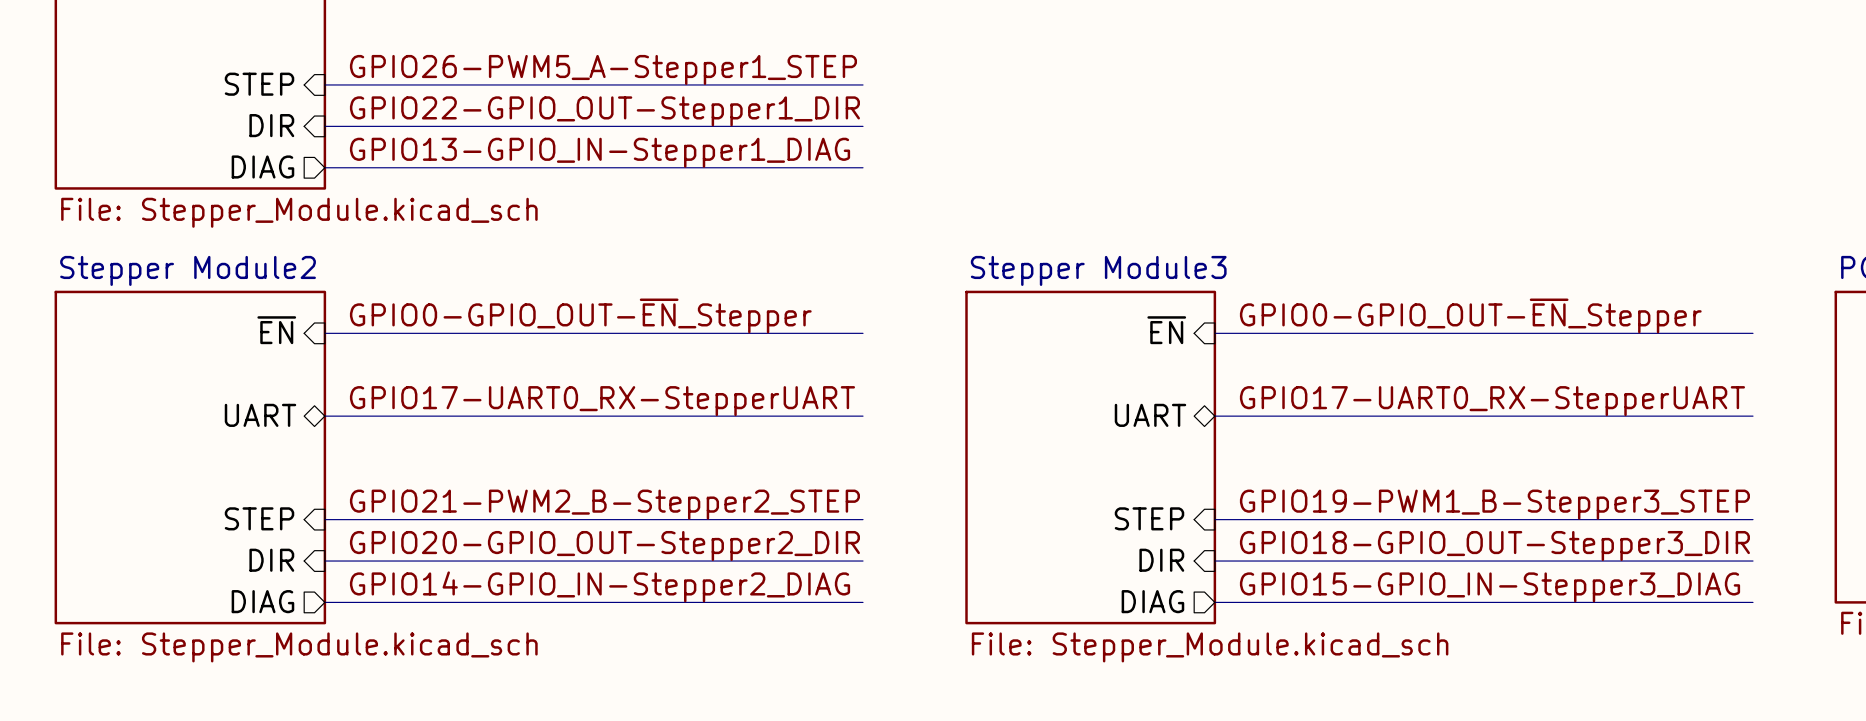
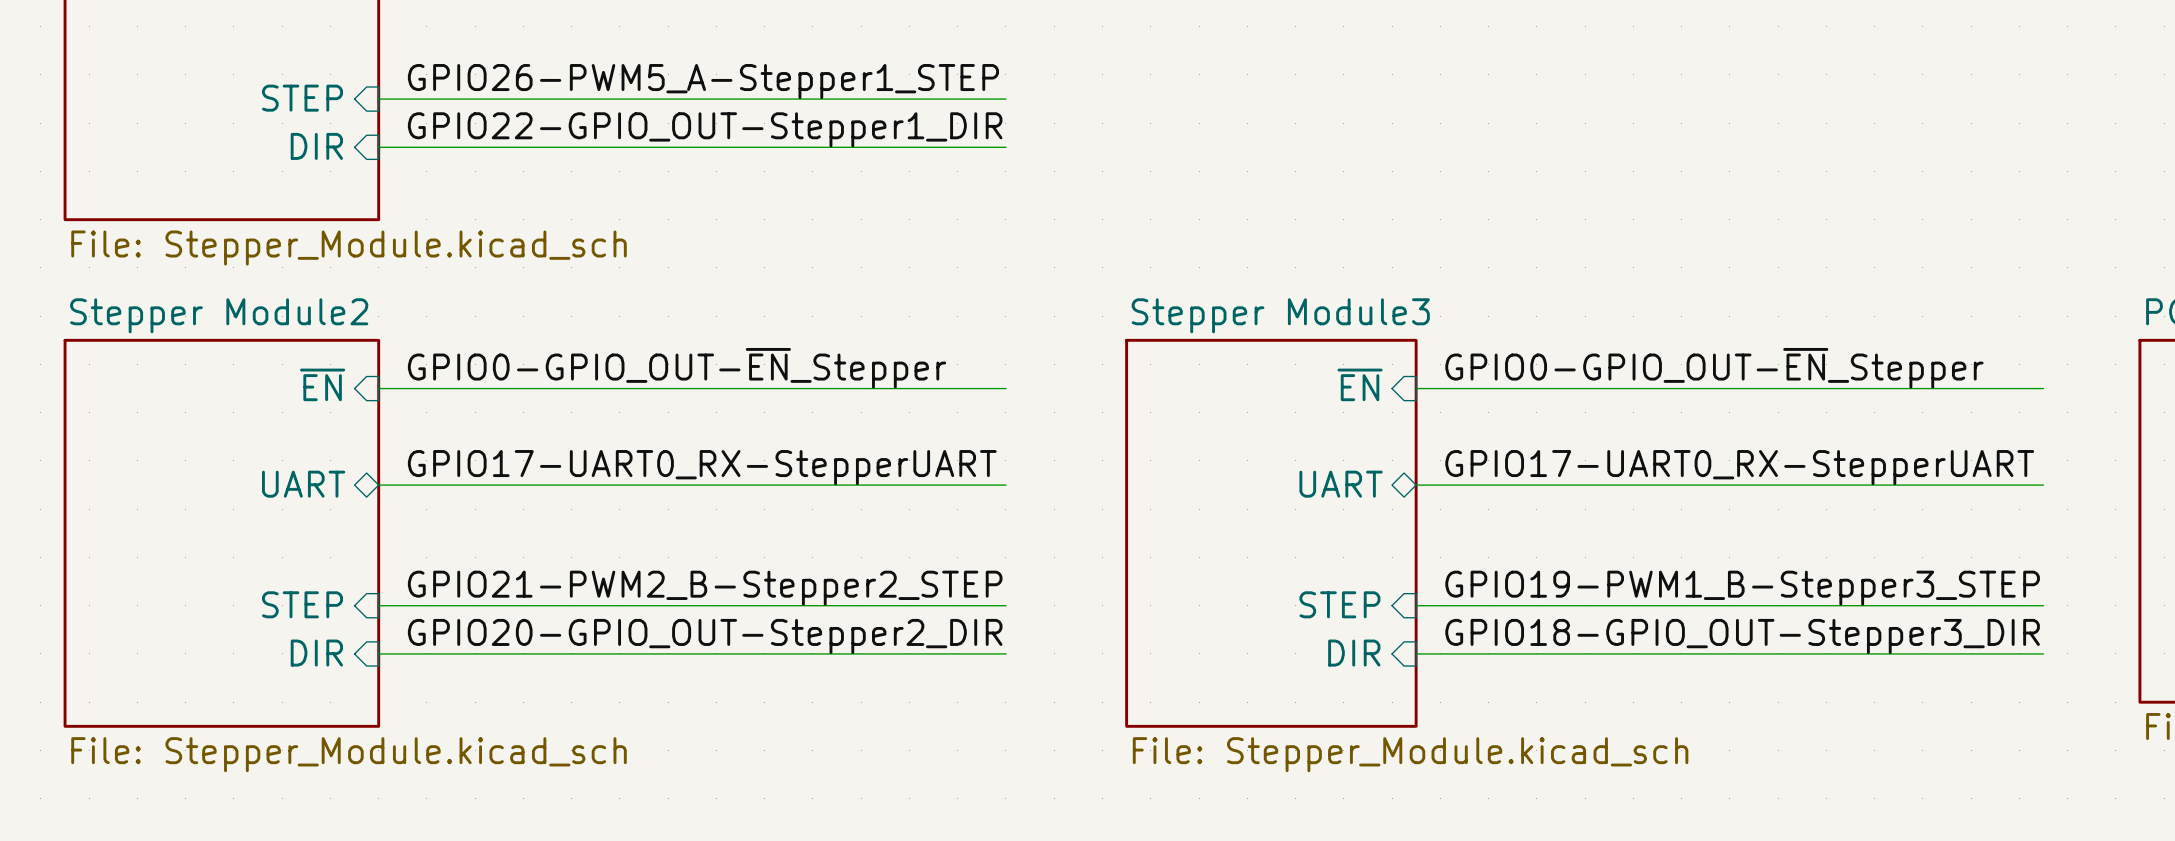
label: GPIO13-GPIO_IN-Stepper1_DIAG (600, 152) -> none
sheet pin: DIAG (262, 166) -> none
wire: (324, 167) (863, 167) -> none
label: GPIO14-GPIO_IN-Stepper2_DIAG (600, 586) -> none
label: GPIO15-GPIO_IN-Stepper3_DIAG (1490, 587) -> none
sheet pin: DIAG (262, 601) -> none
sheet pin: DIAG (1152, 601) -> none
wire: (324, 602) (863, 602) -> none
wire: (1214, 602) (1753, 602) -> none

